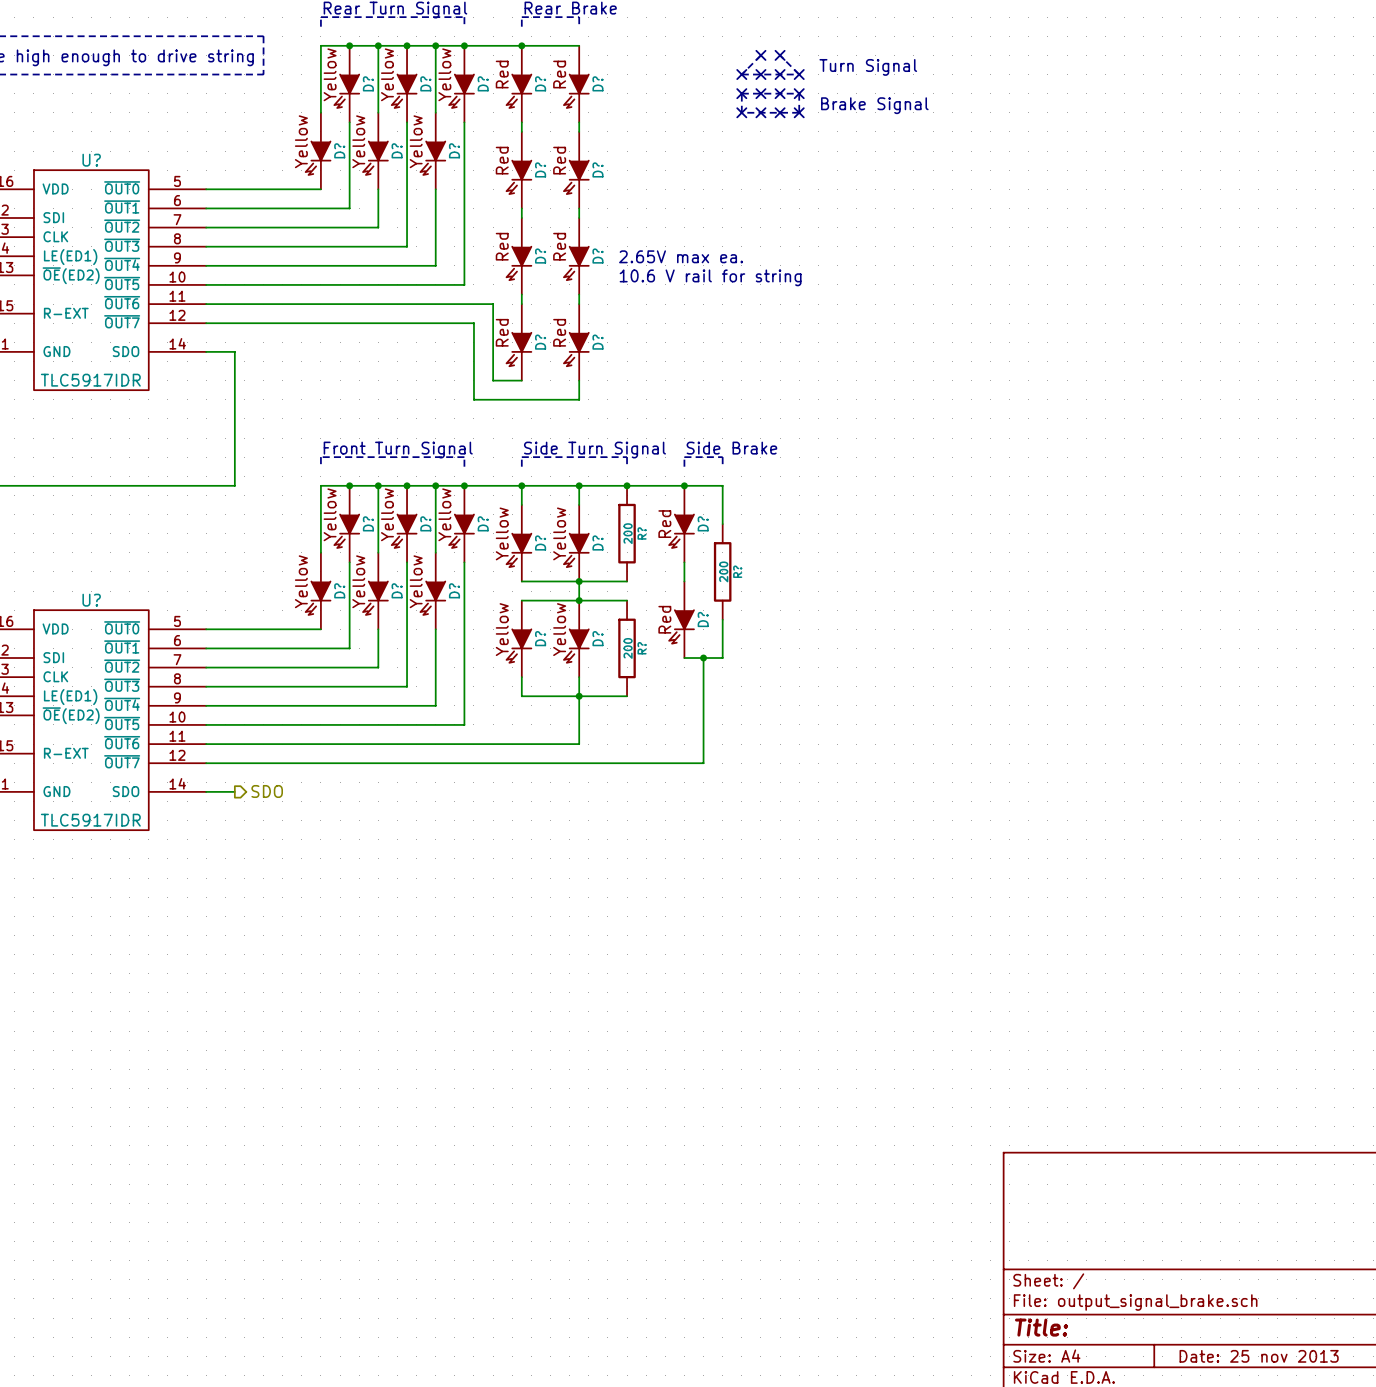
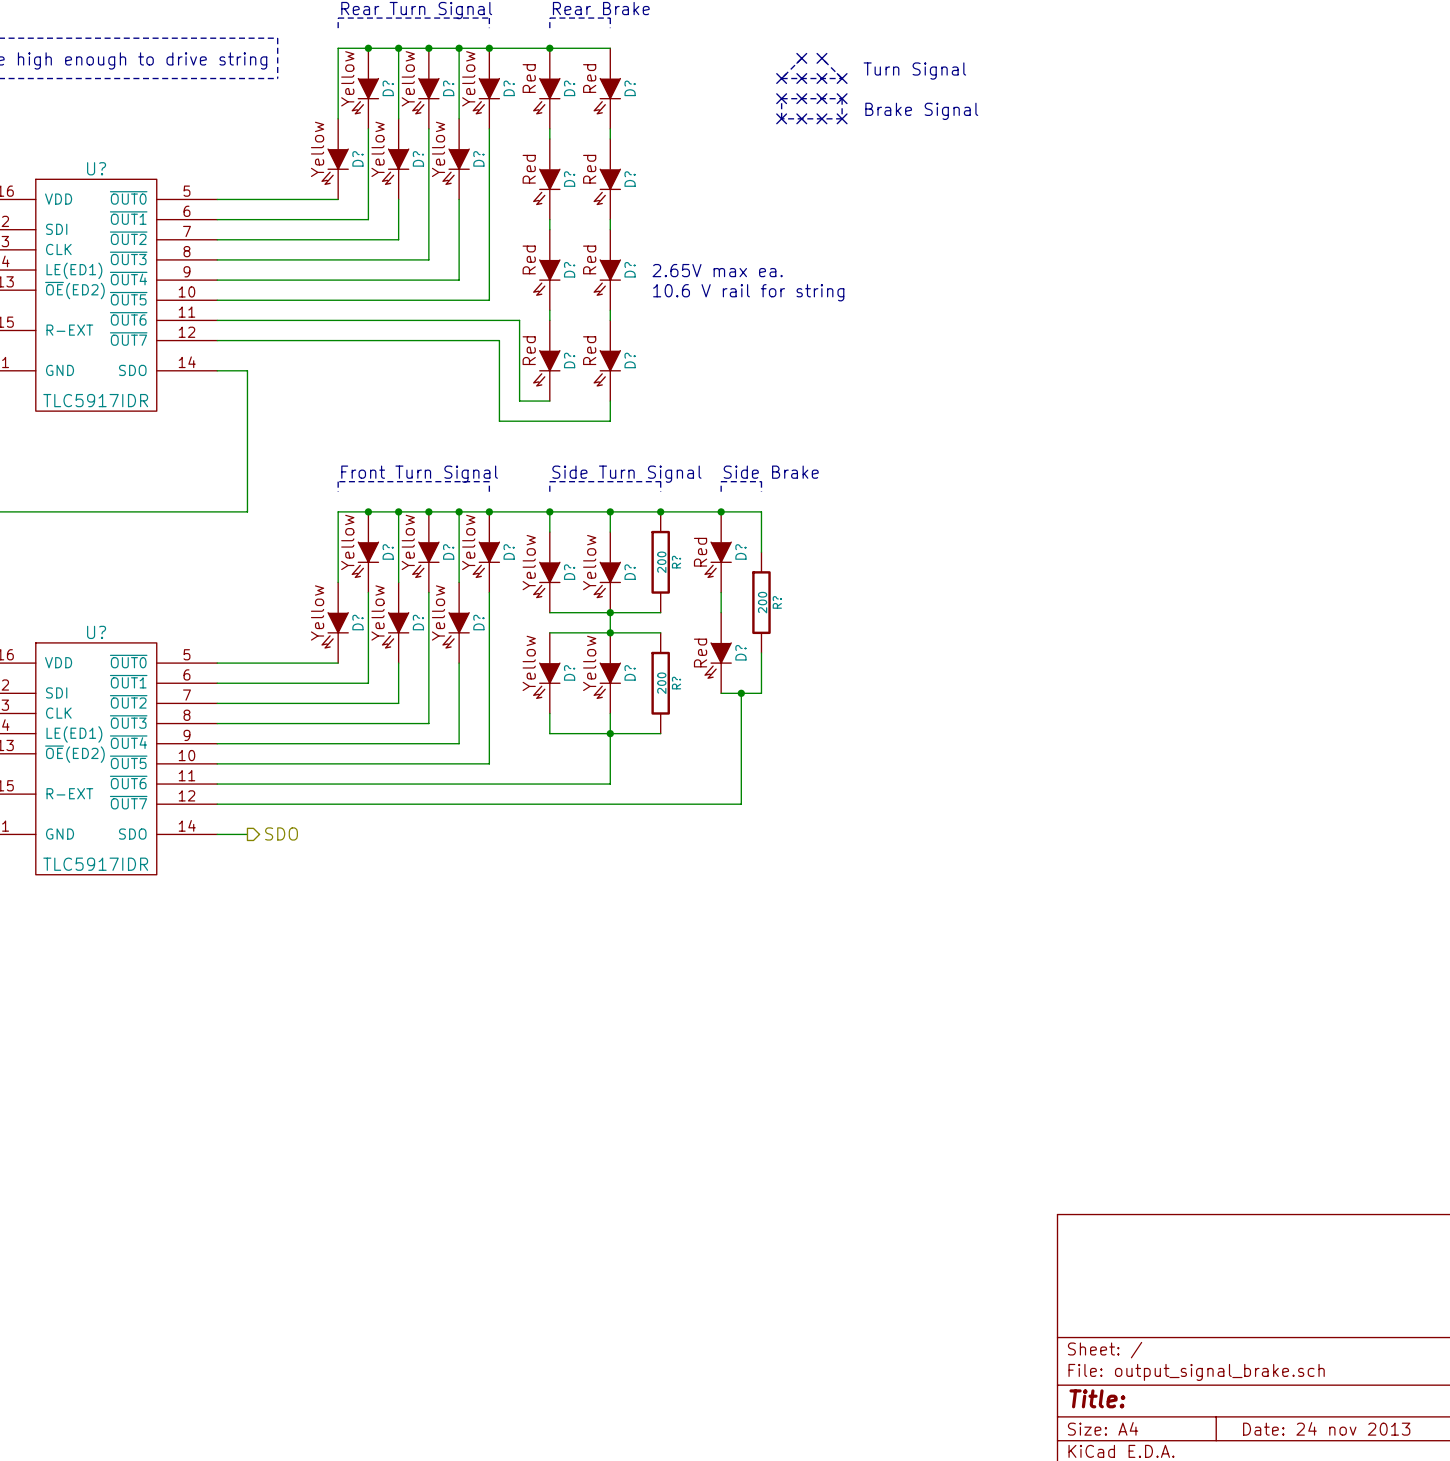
title block: Date: 25 nov 2013 (1259, 1356) -> Date: 24 nov 2013 (1326, 1428)

